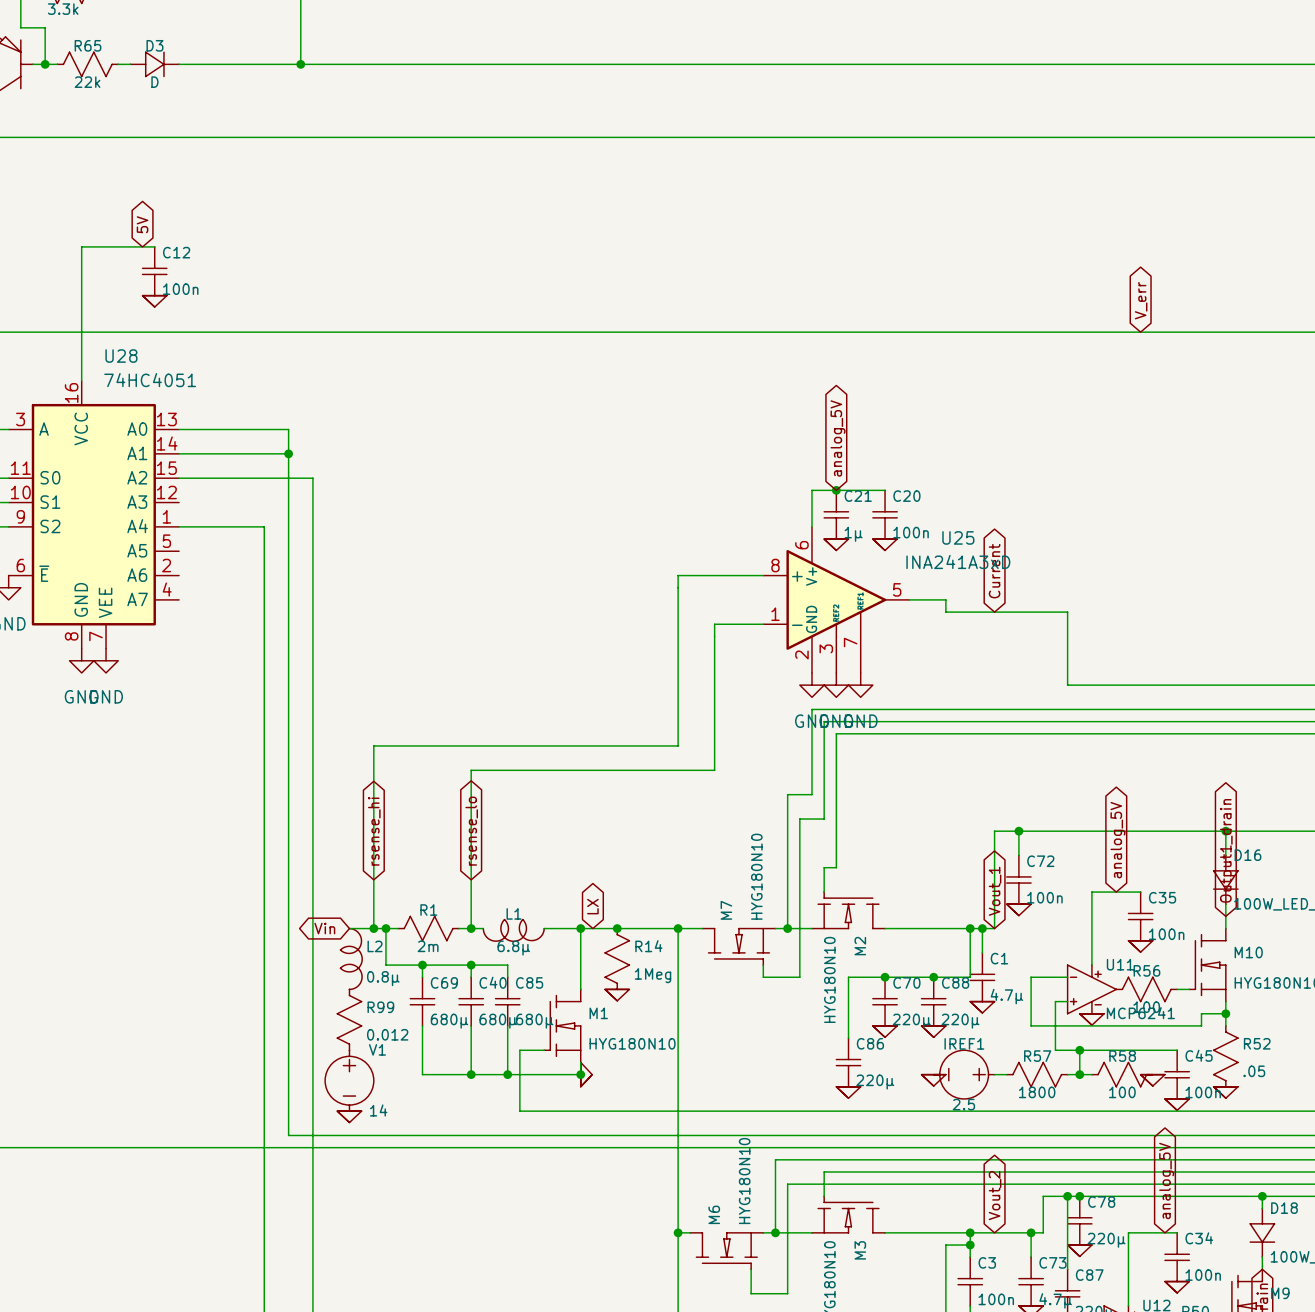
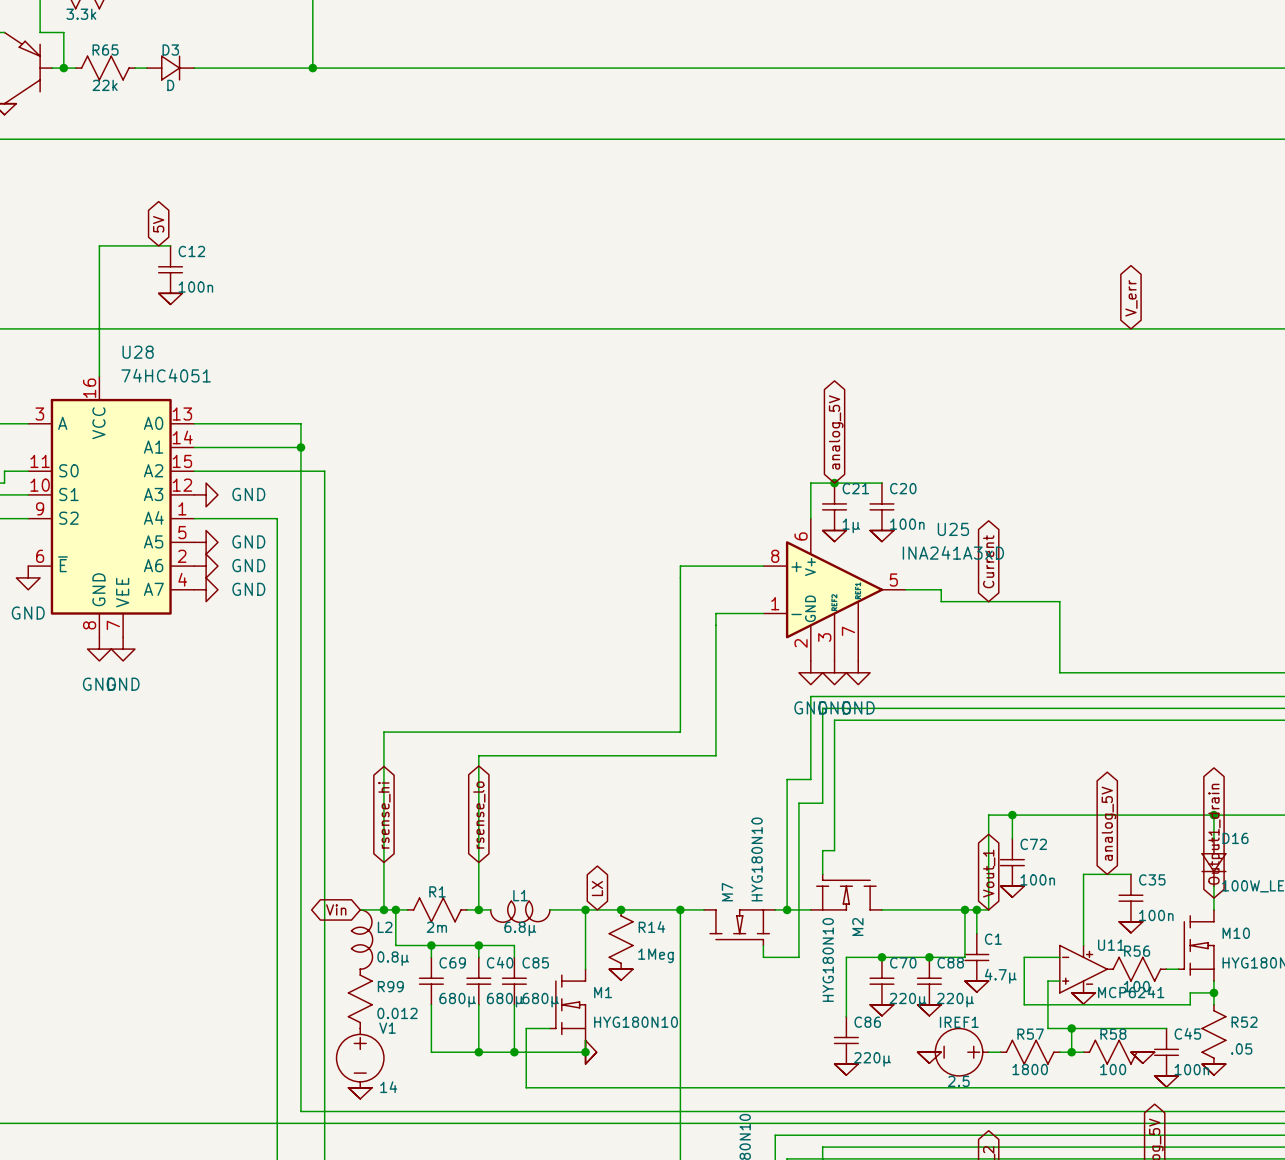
power symbol: none -> GND (206, 494)
power symbol: none -> GND (206, 542)
power symbol: none -> GND (206, 566)
power symbol: none -> GND (206, 589)

